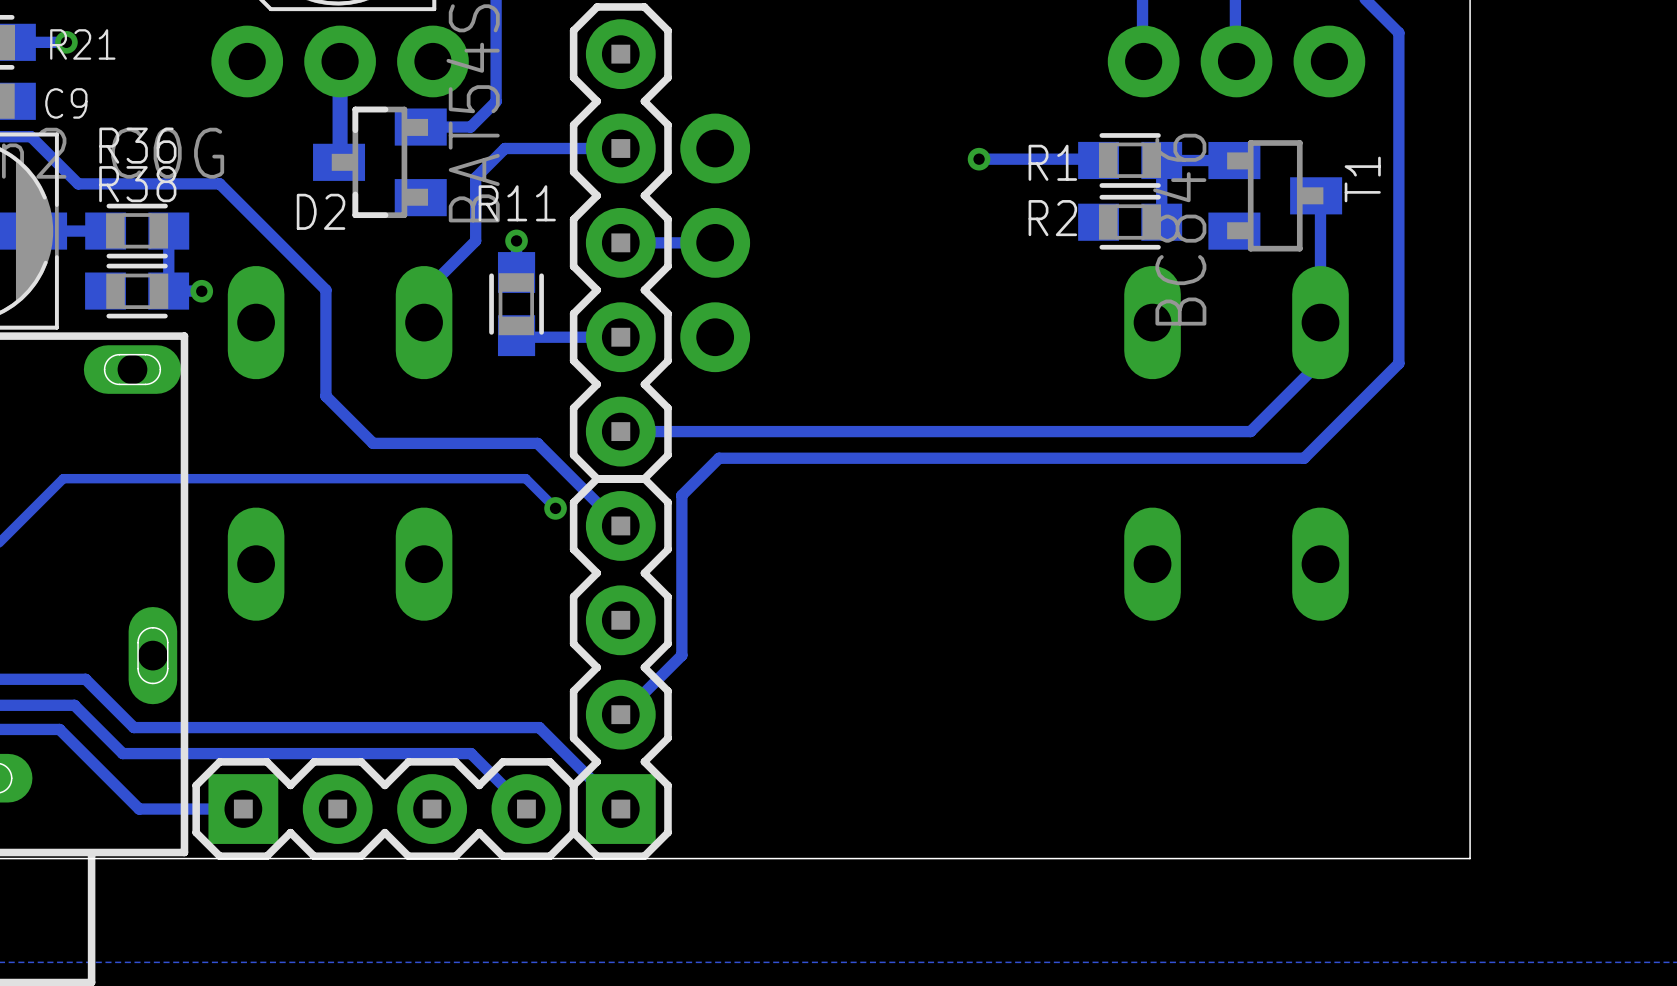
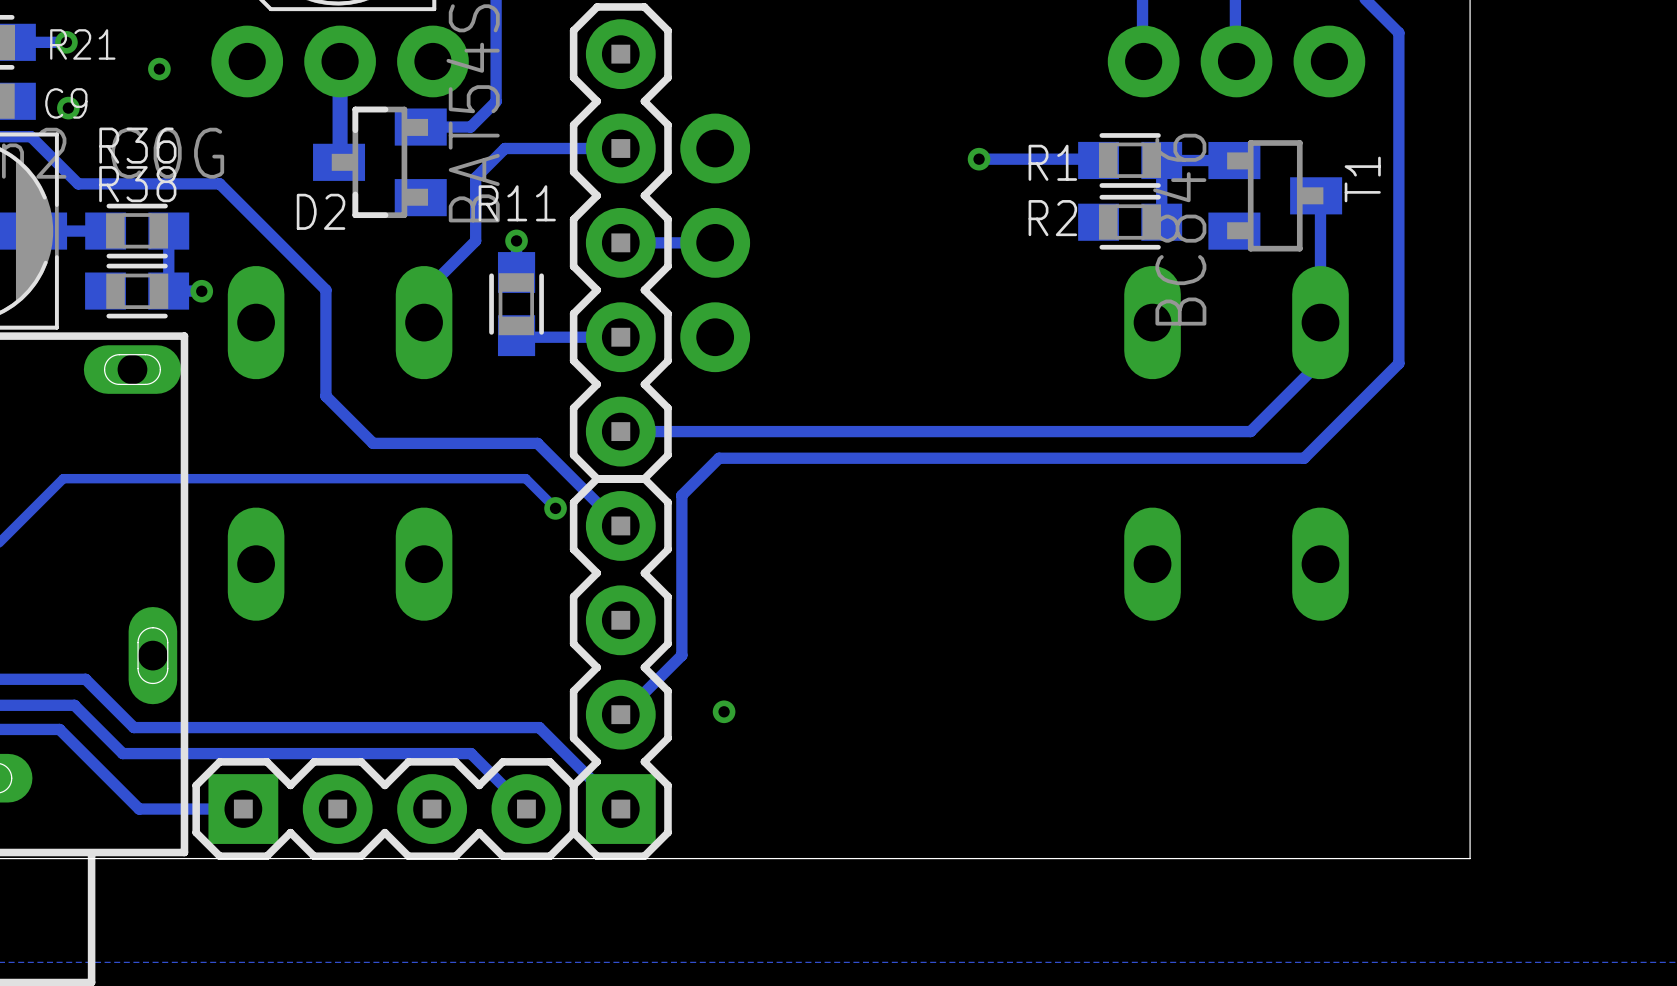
via: none -> (159, 69)
via: none -> (68, 108)
via: none -> (724, 711)

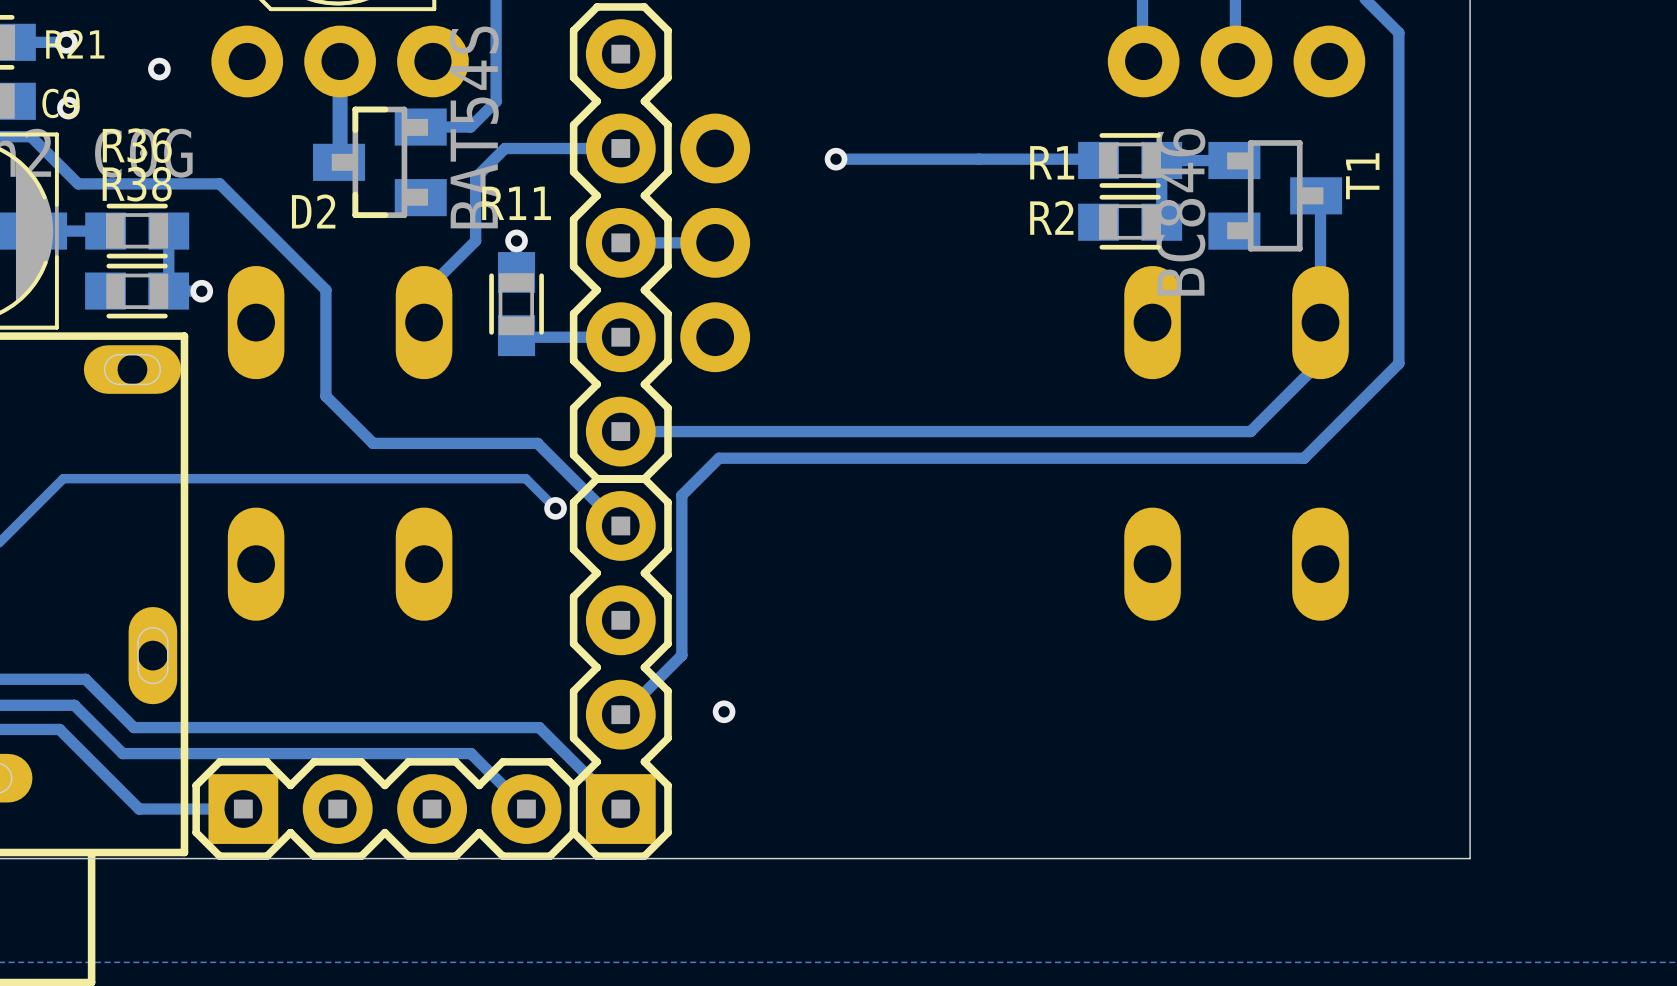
track: none -> (979, 159) (836, 159)
via position: (979, 159) -> (836, 159)

